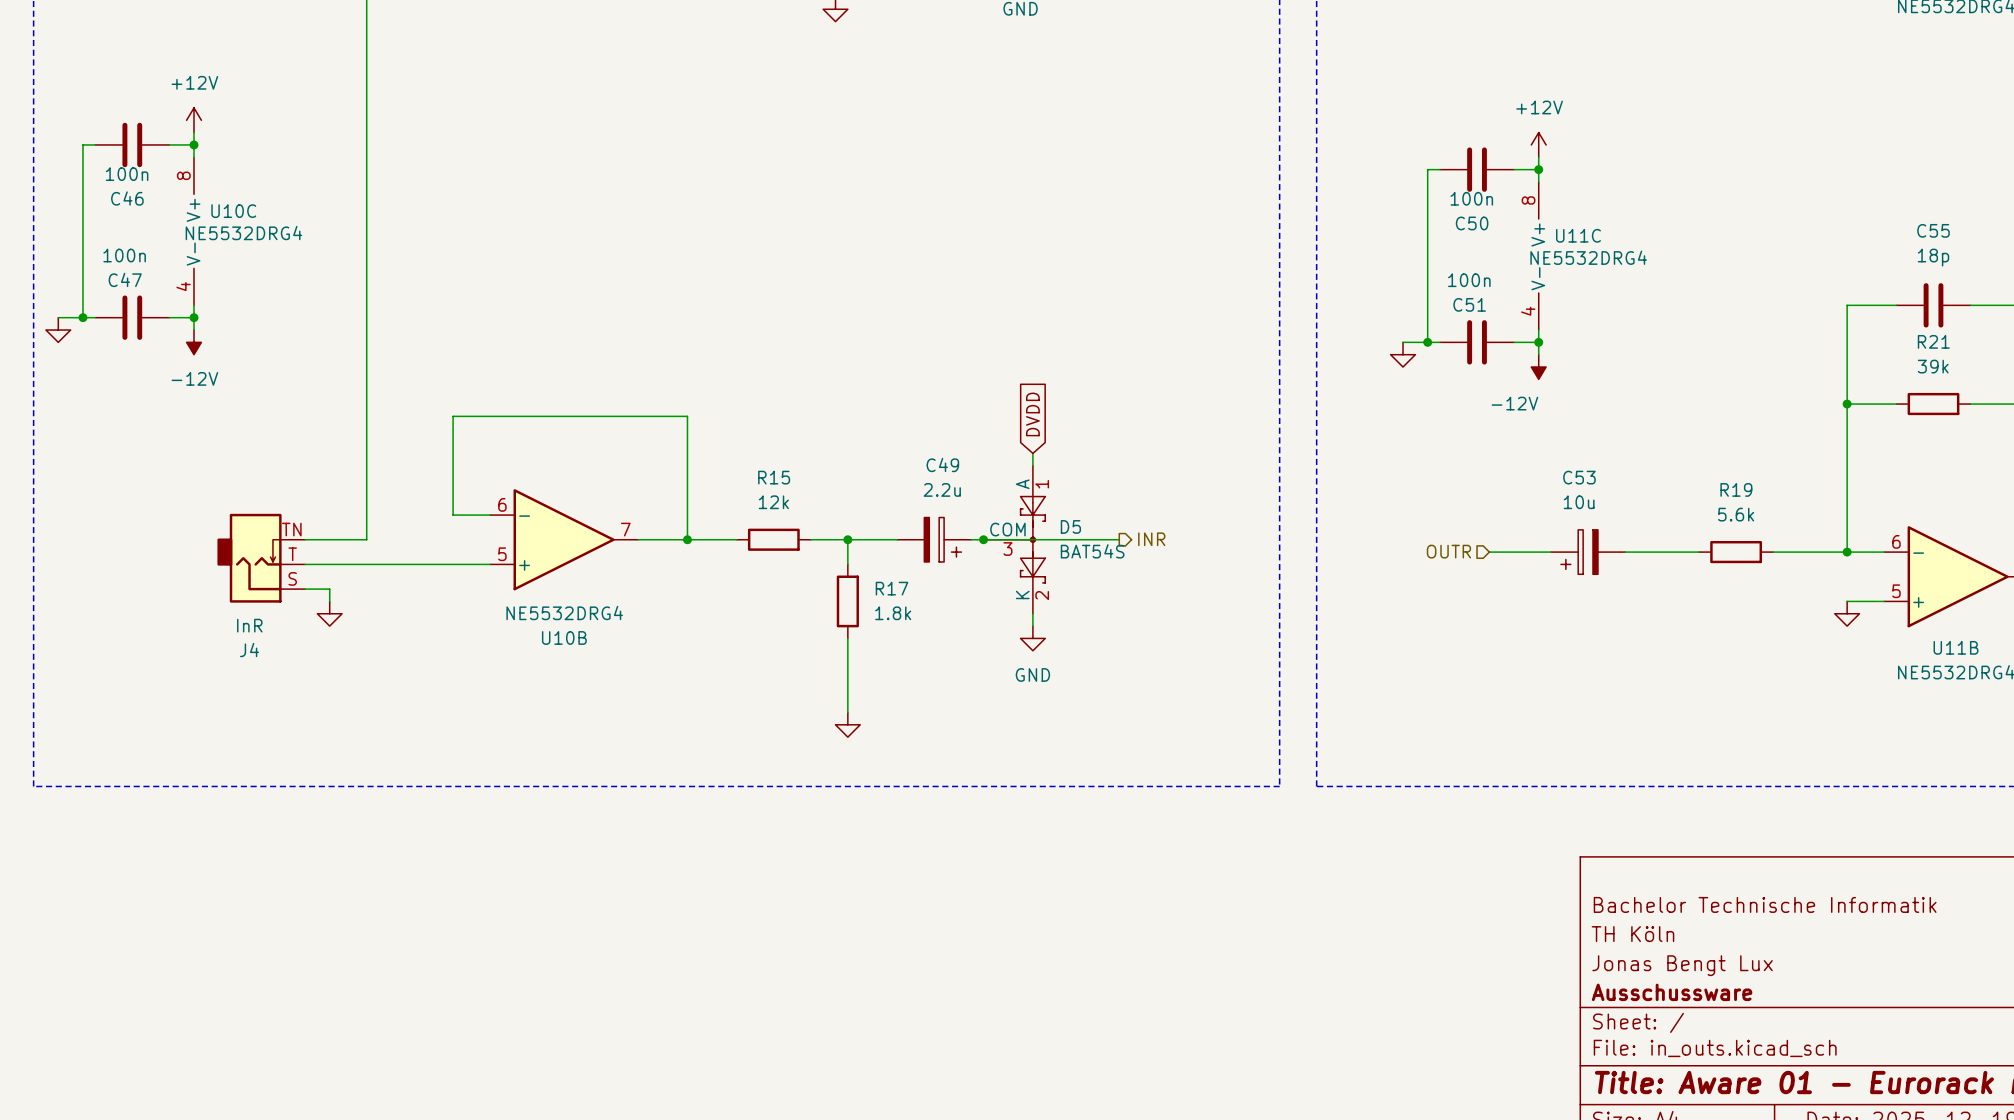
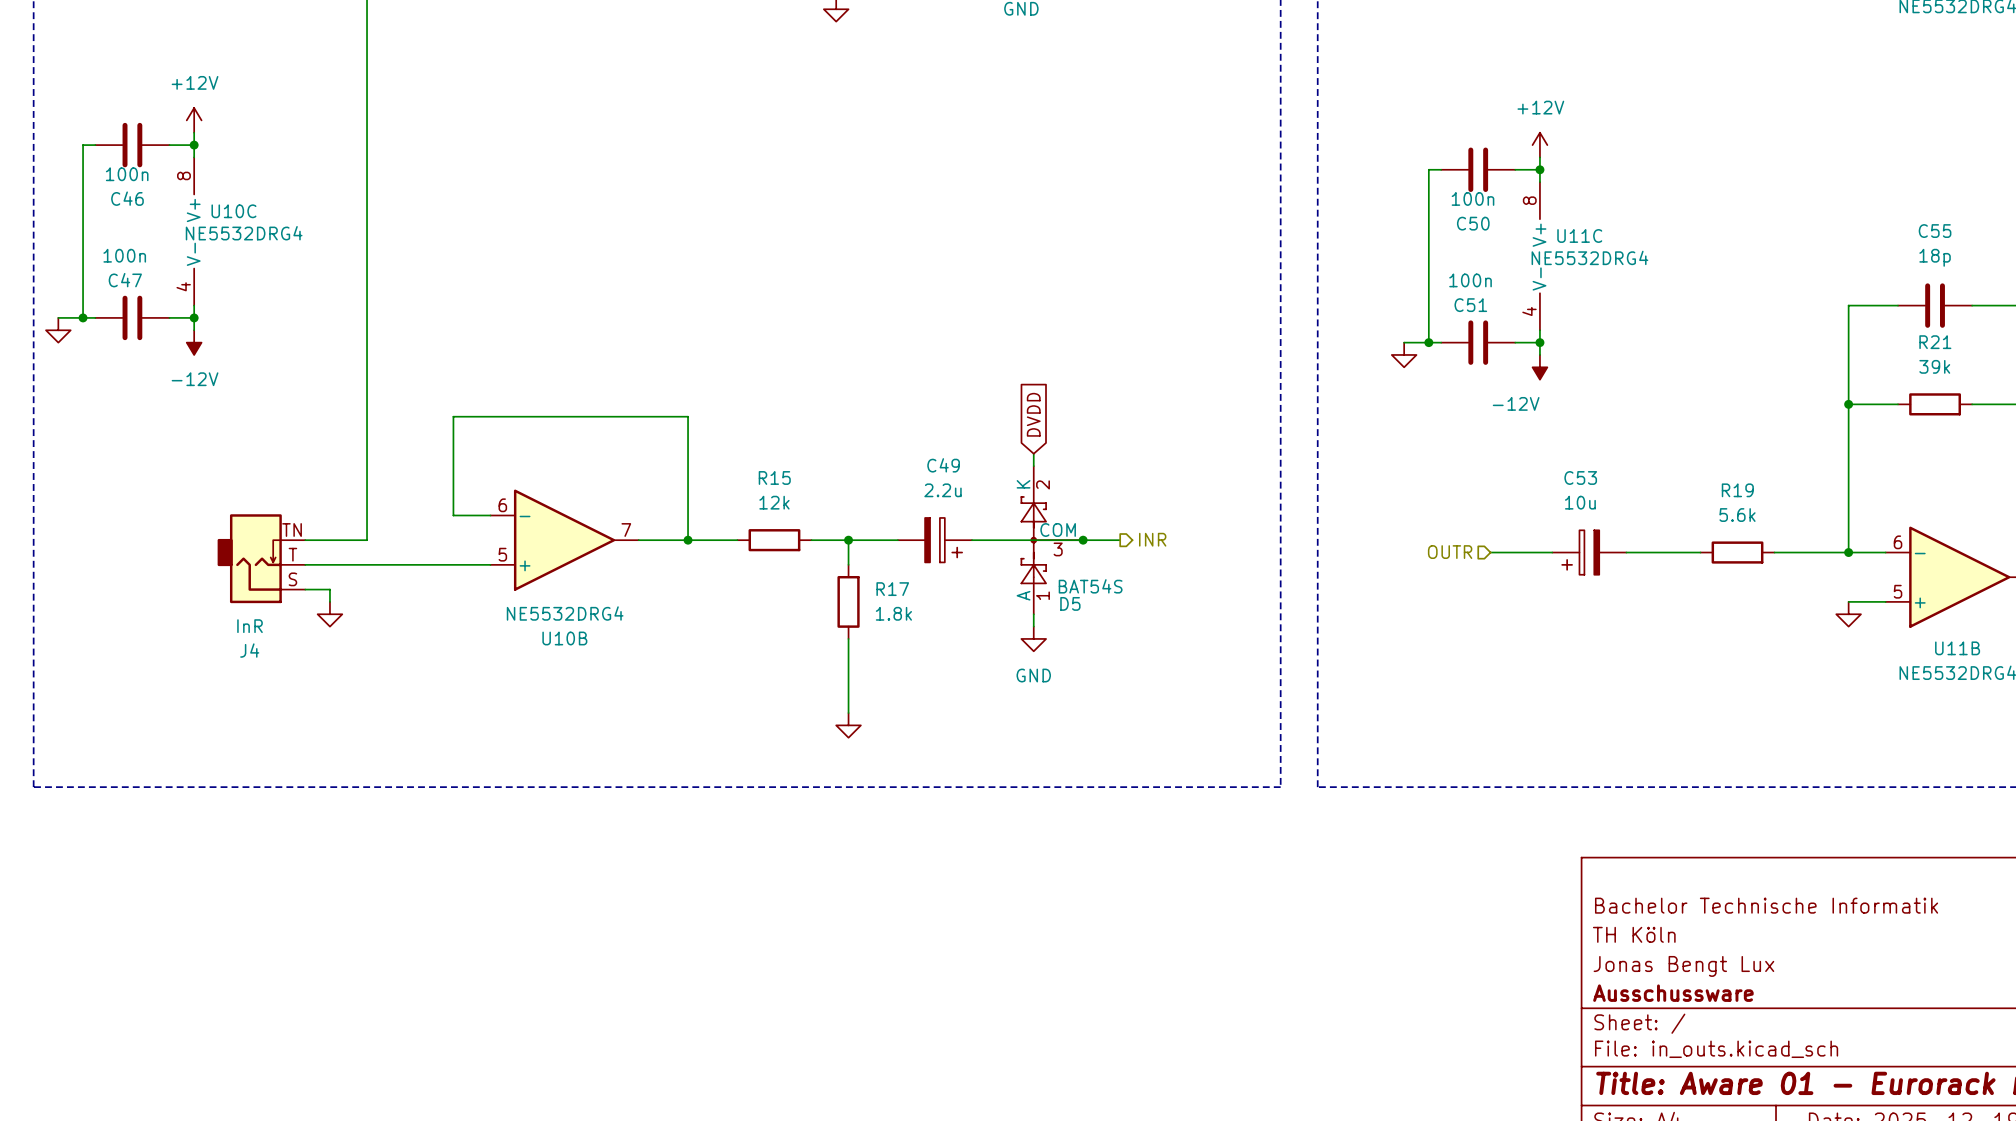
D5 name position: D5 (1070, 526) -> D5 (1070, 603)
junction: (983, 539) -> none
D5 rotation: 0° (1032, 539) -> 180° (1033, 540)
junction: none -> (1083, 540)
D5 value position: BAT54S (1092, 551) -> BAT54S (1090, 586)

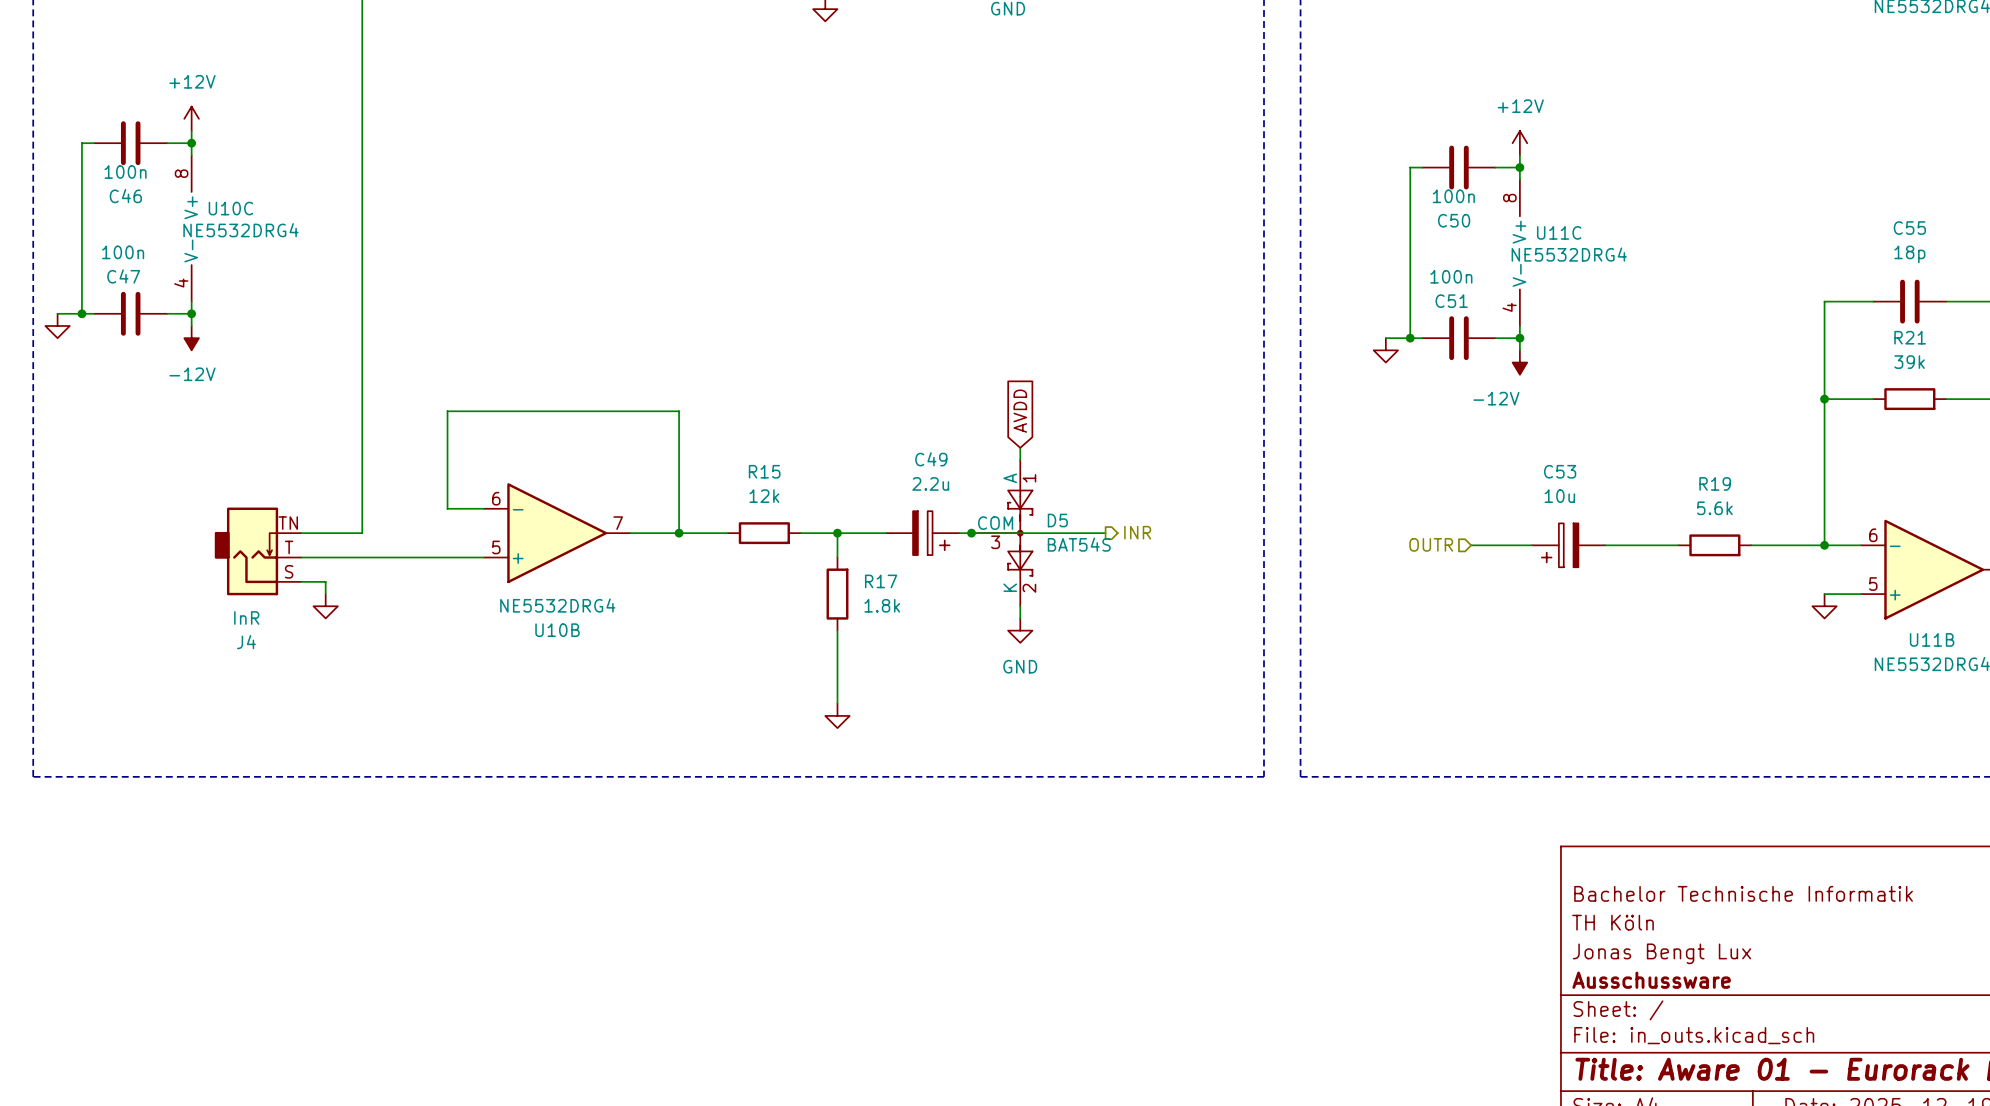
global label: DVDD (1033, 414) -> AVDD (1020, 411)
junction: none -> (971, 533)
D5 rotation: 0° (1033, 540) -> 180° (1020, 533)
junction: (1083, 540) -> none
D5 value position: BAT54S (1090, 586) -> BAT54S (1079, 544)
D5 name position: D5 (1070, 603) -> D5 (1057, 520)

